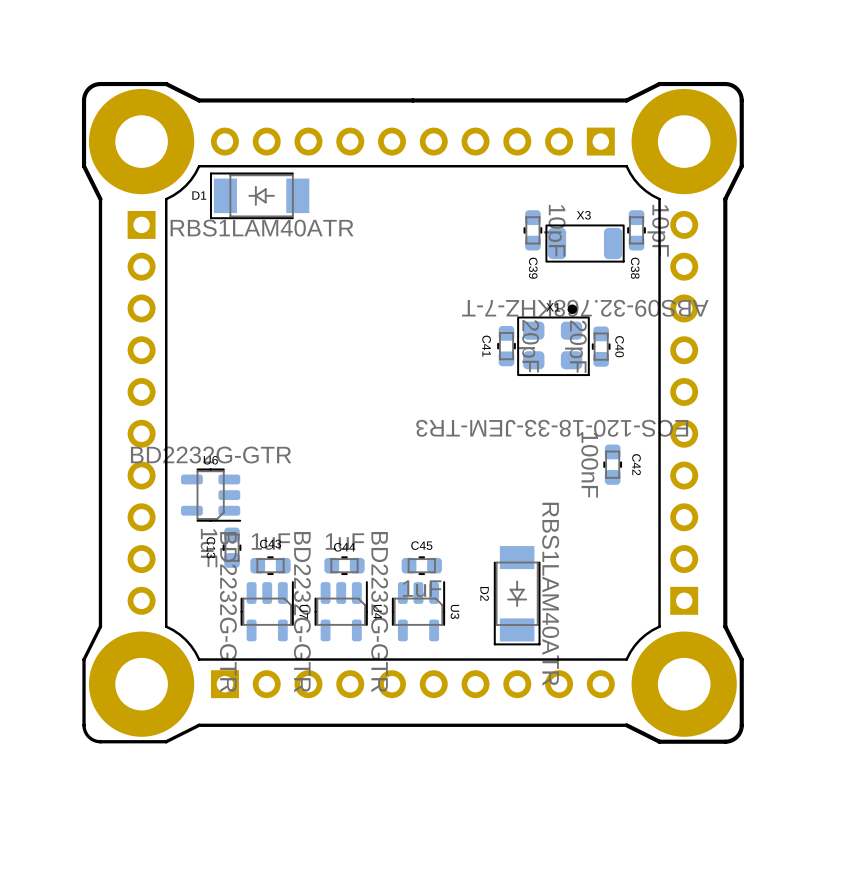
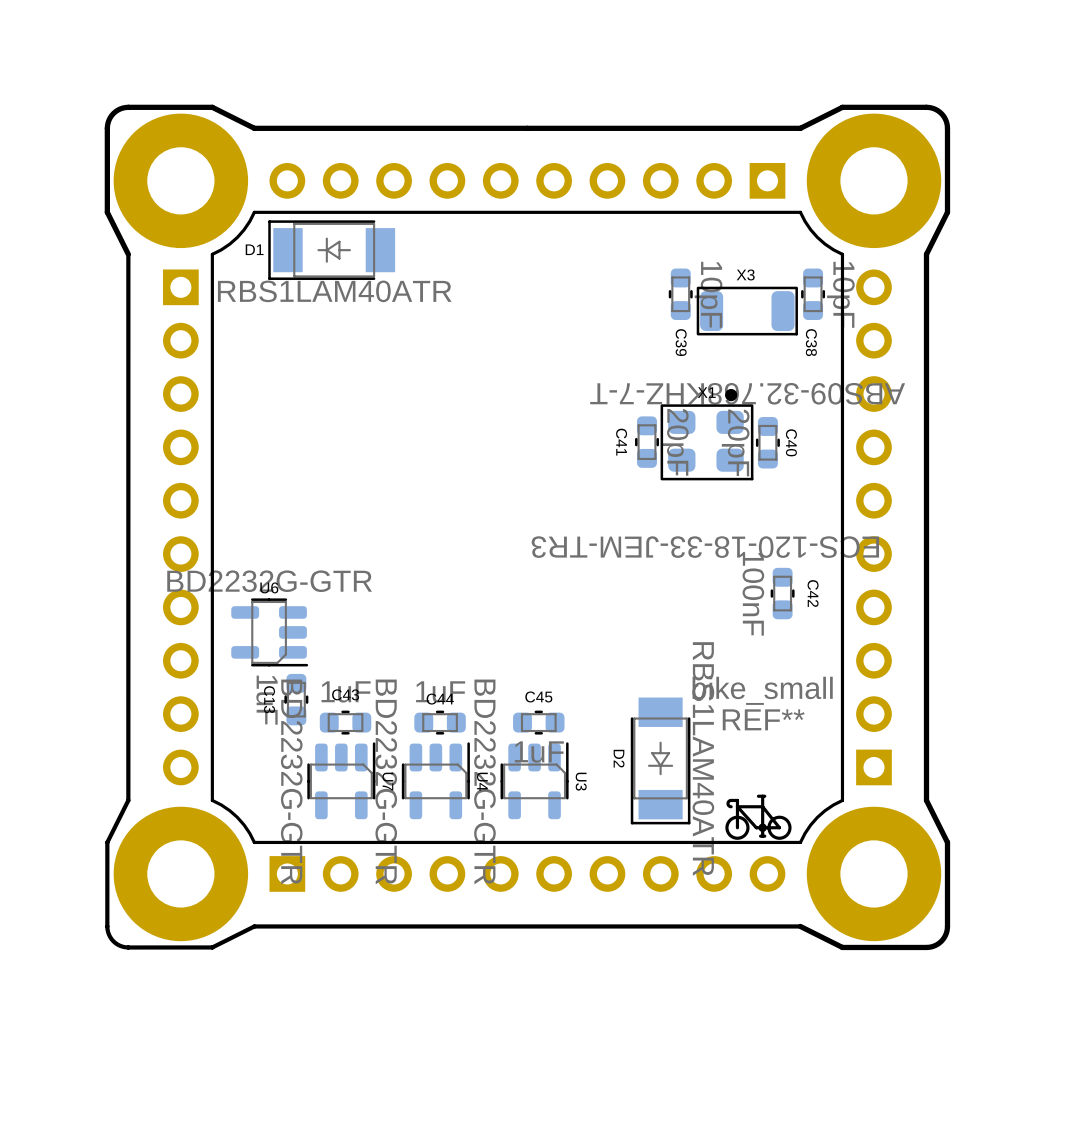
REF**: none -> bike_small (758, 817)

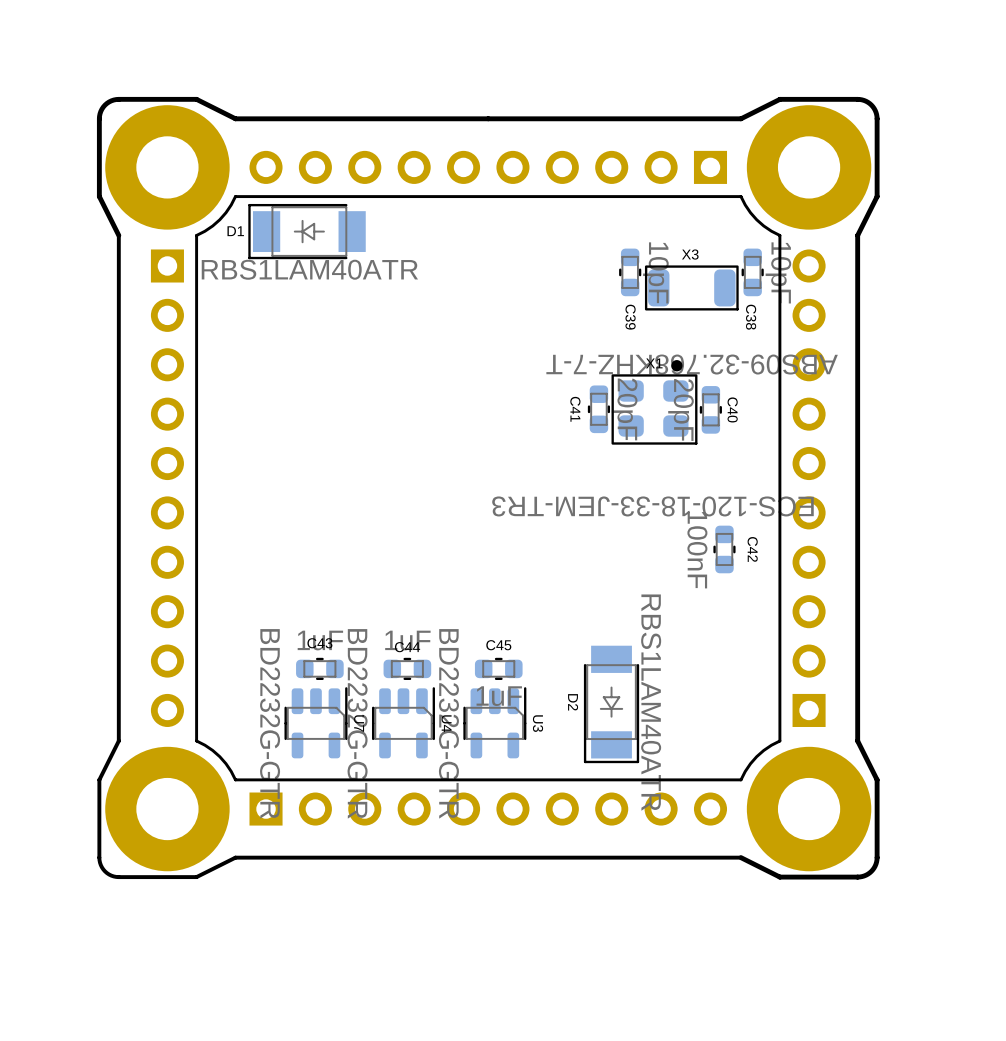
U6: BD2232G-GTR (269, 632) -> none
C13: 1uF (296, 699) -> none
REF**: bike_small (758, 817) -> none

